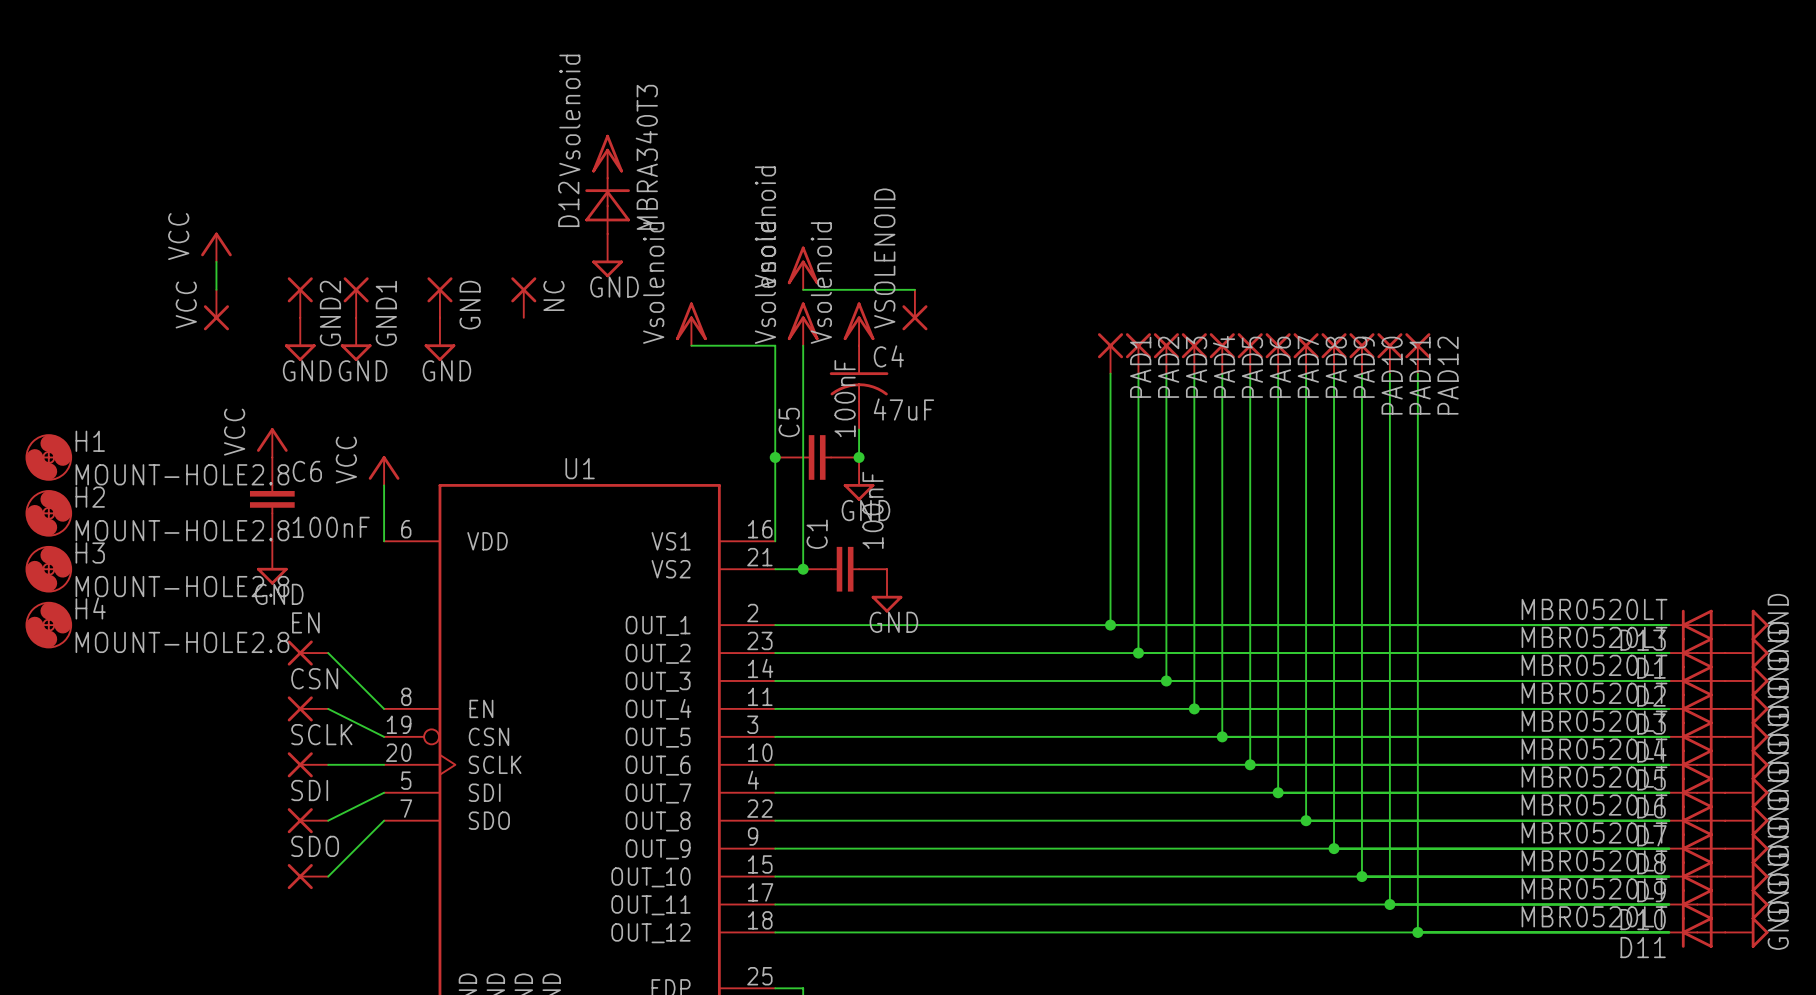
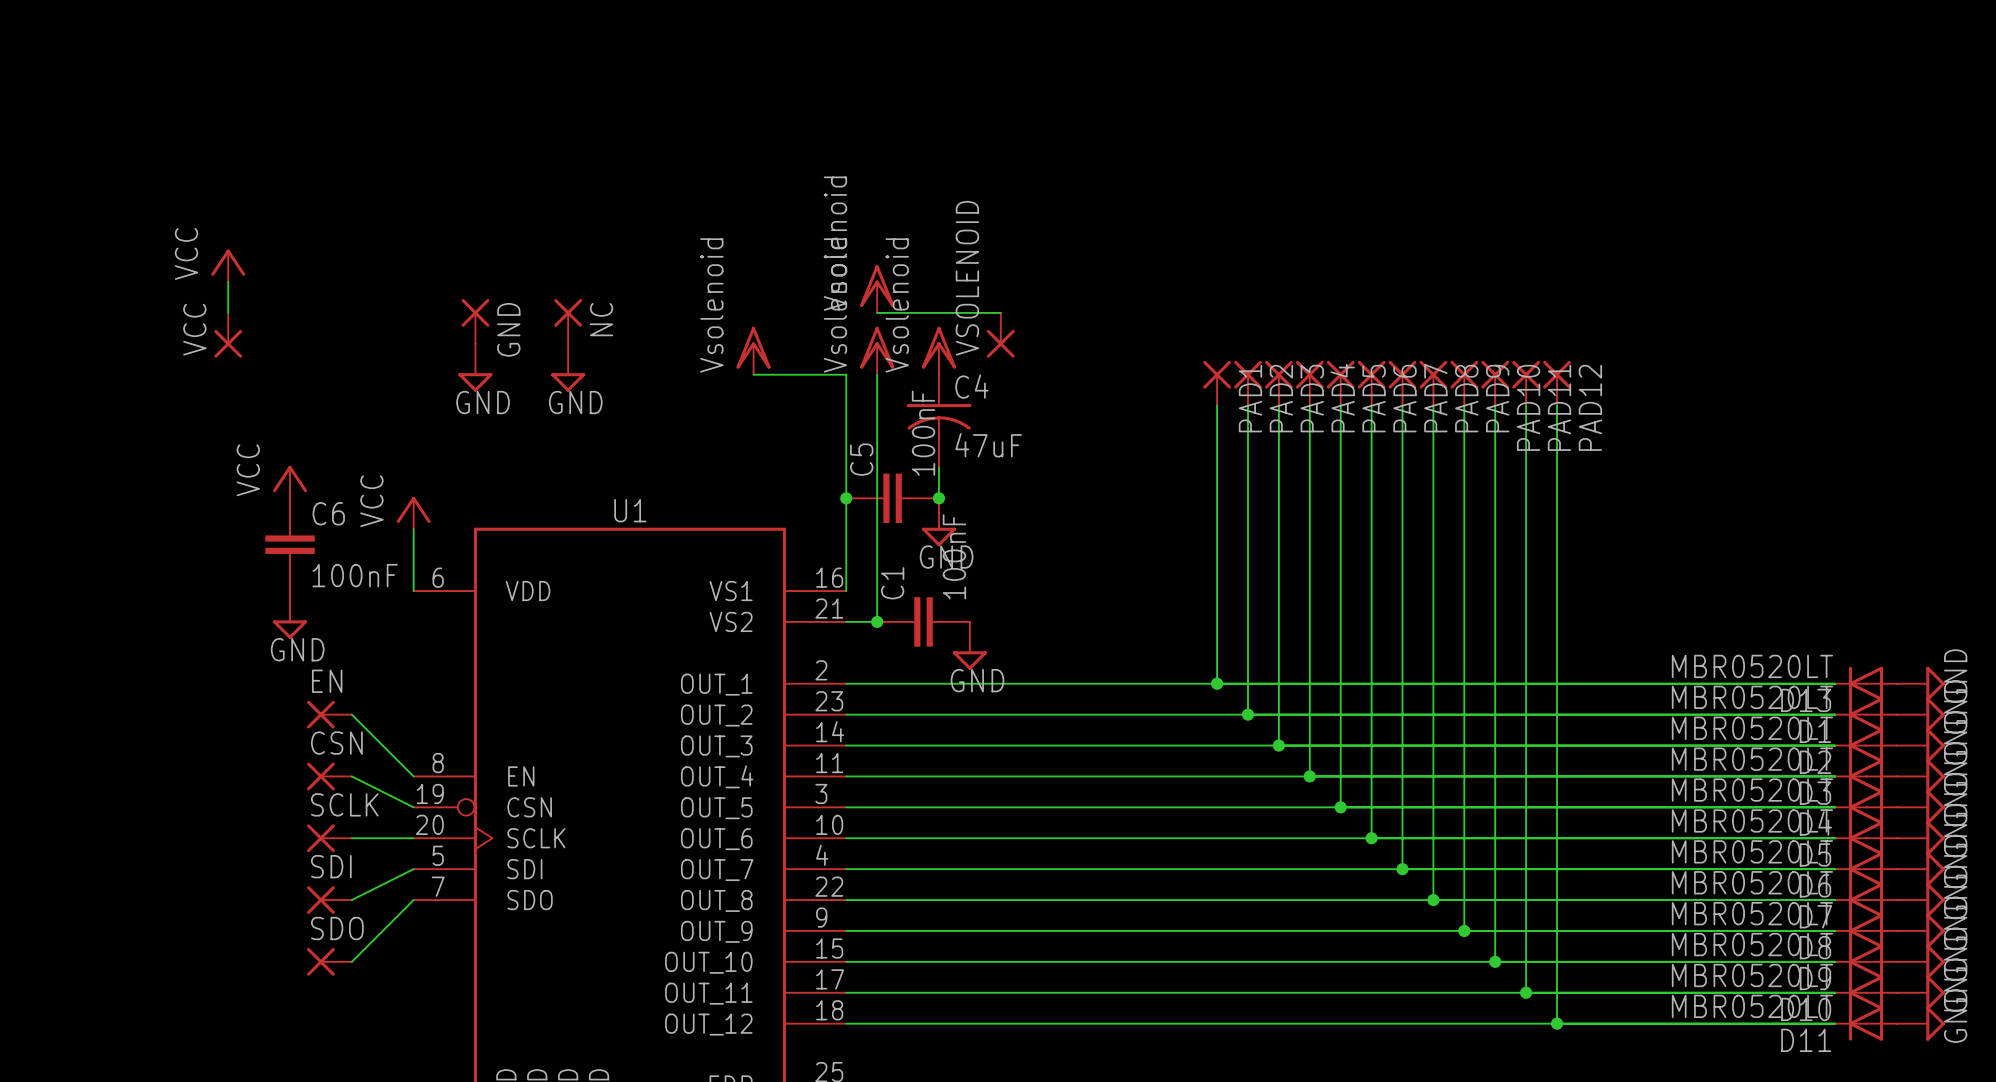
power symbol: Vsolenoid (607, 156) -> none
D12: MBRA340T3 (607, 206) -> none
power symbol: GND (607, 255) -> none
GND2: (300, 297) -> none
GND1: (356, 297) -> none
power symbol: GND (300, 339) -> none
power symbol: GND (356, 339) -> none
power symbol: none -> GND (568, 367)
H1: MOUNT-HOLE2.8 (48, 457) -> none
H2: MOUNT-HOLE2.8 (48, 513) -> none
H3: MOUNT-HOLE2.8 (48, 569) -> none
H4: MOUNT-HOLE2.8 (48, 625) -> none

